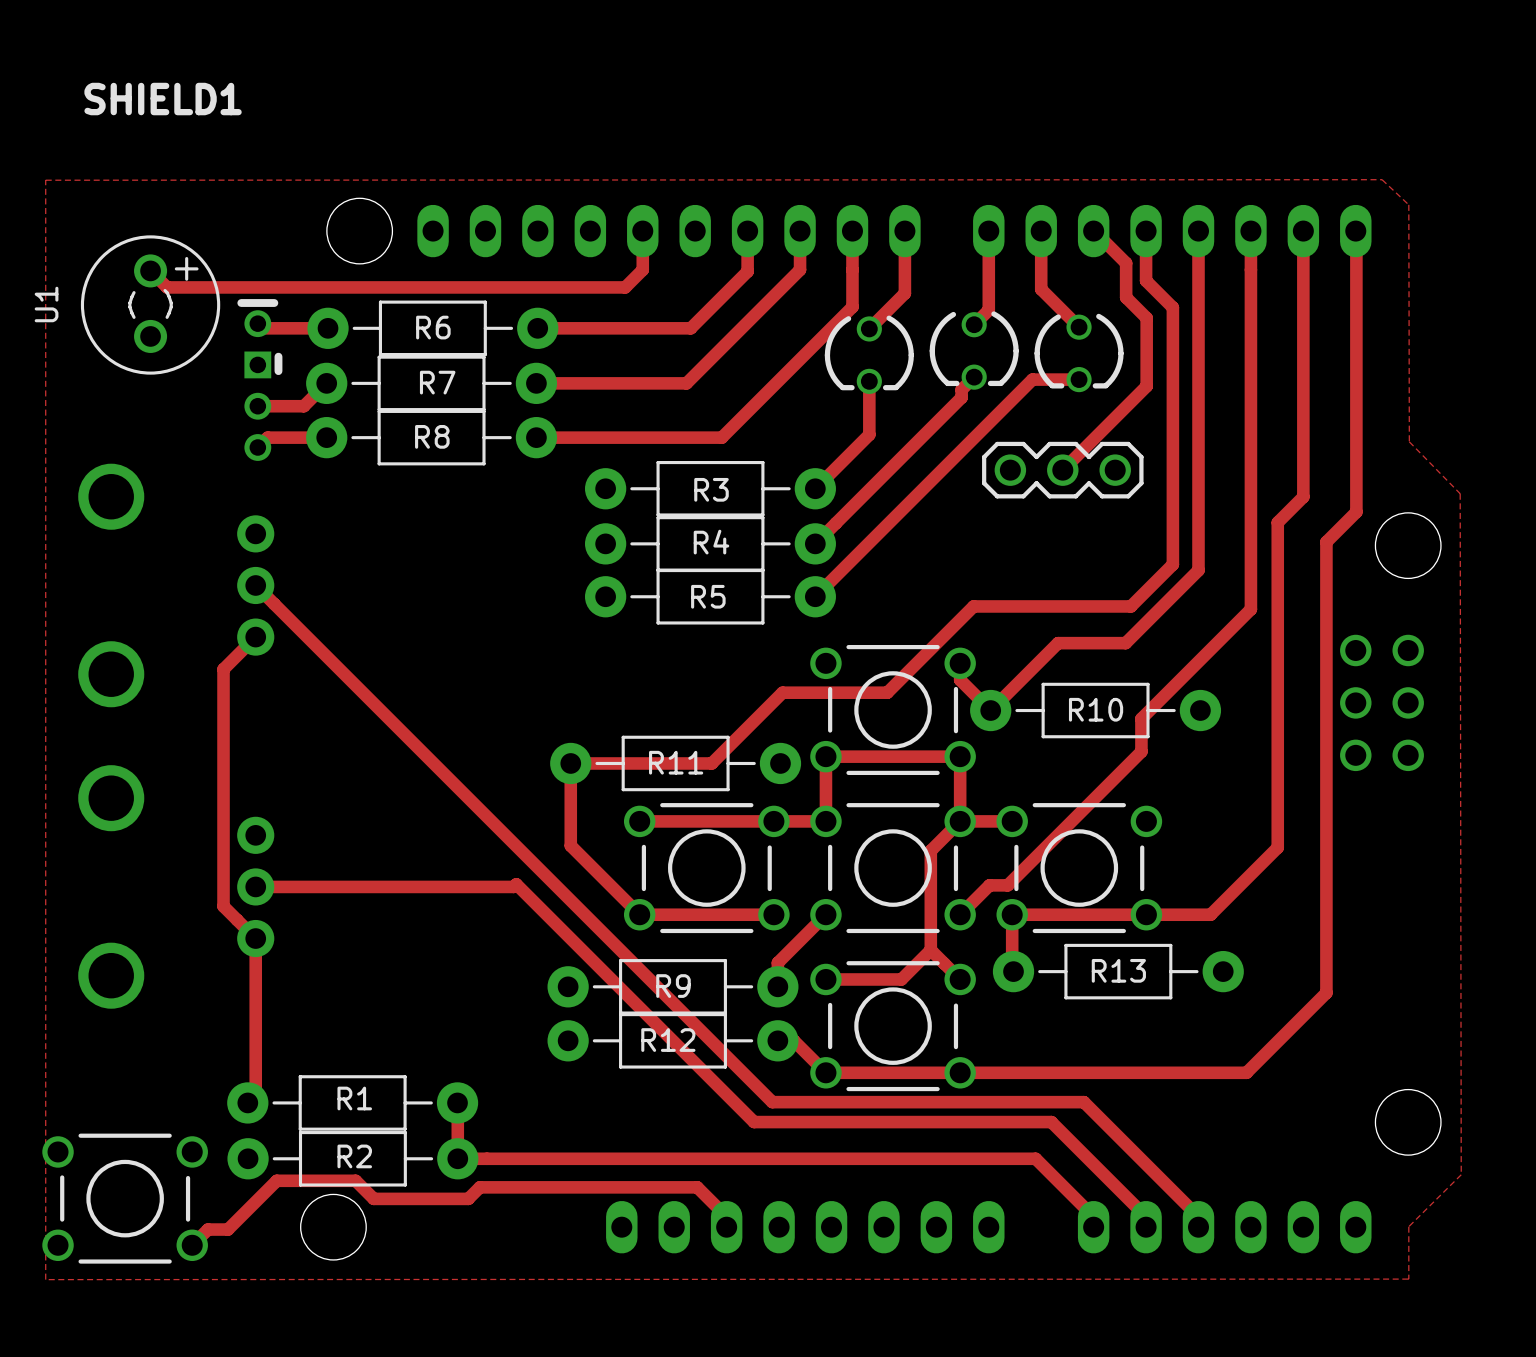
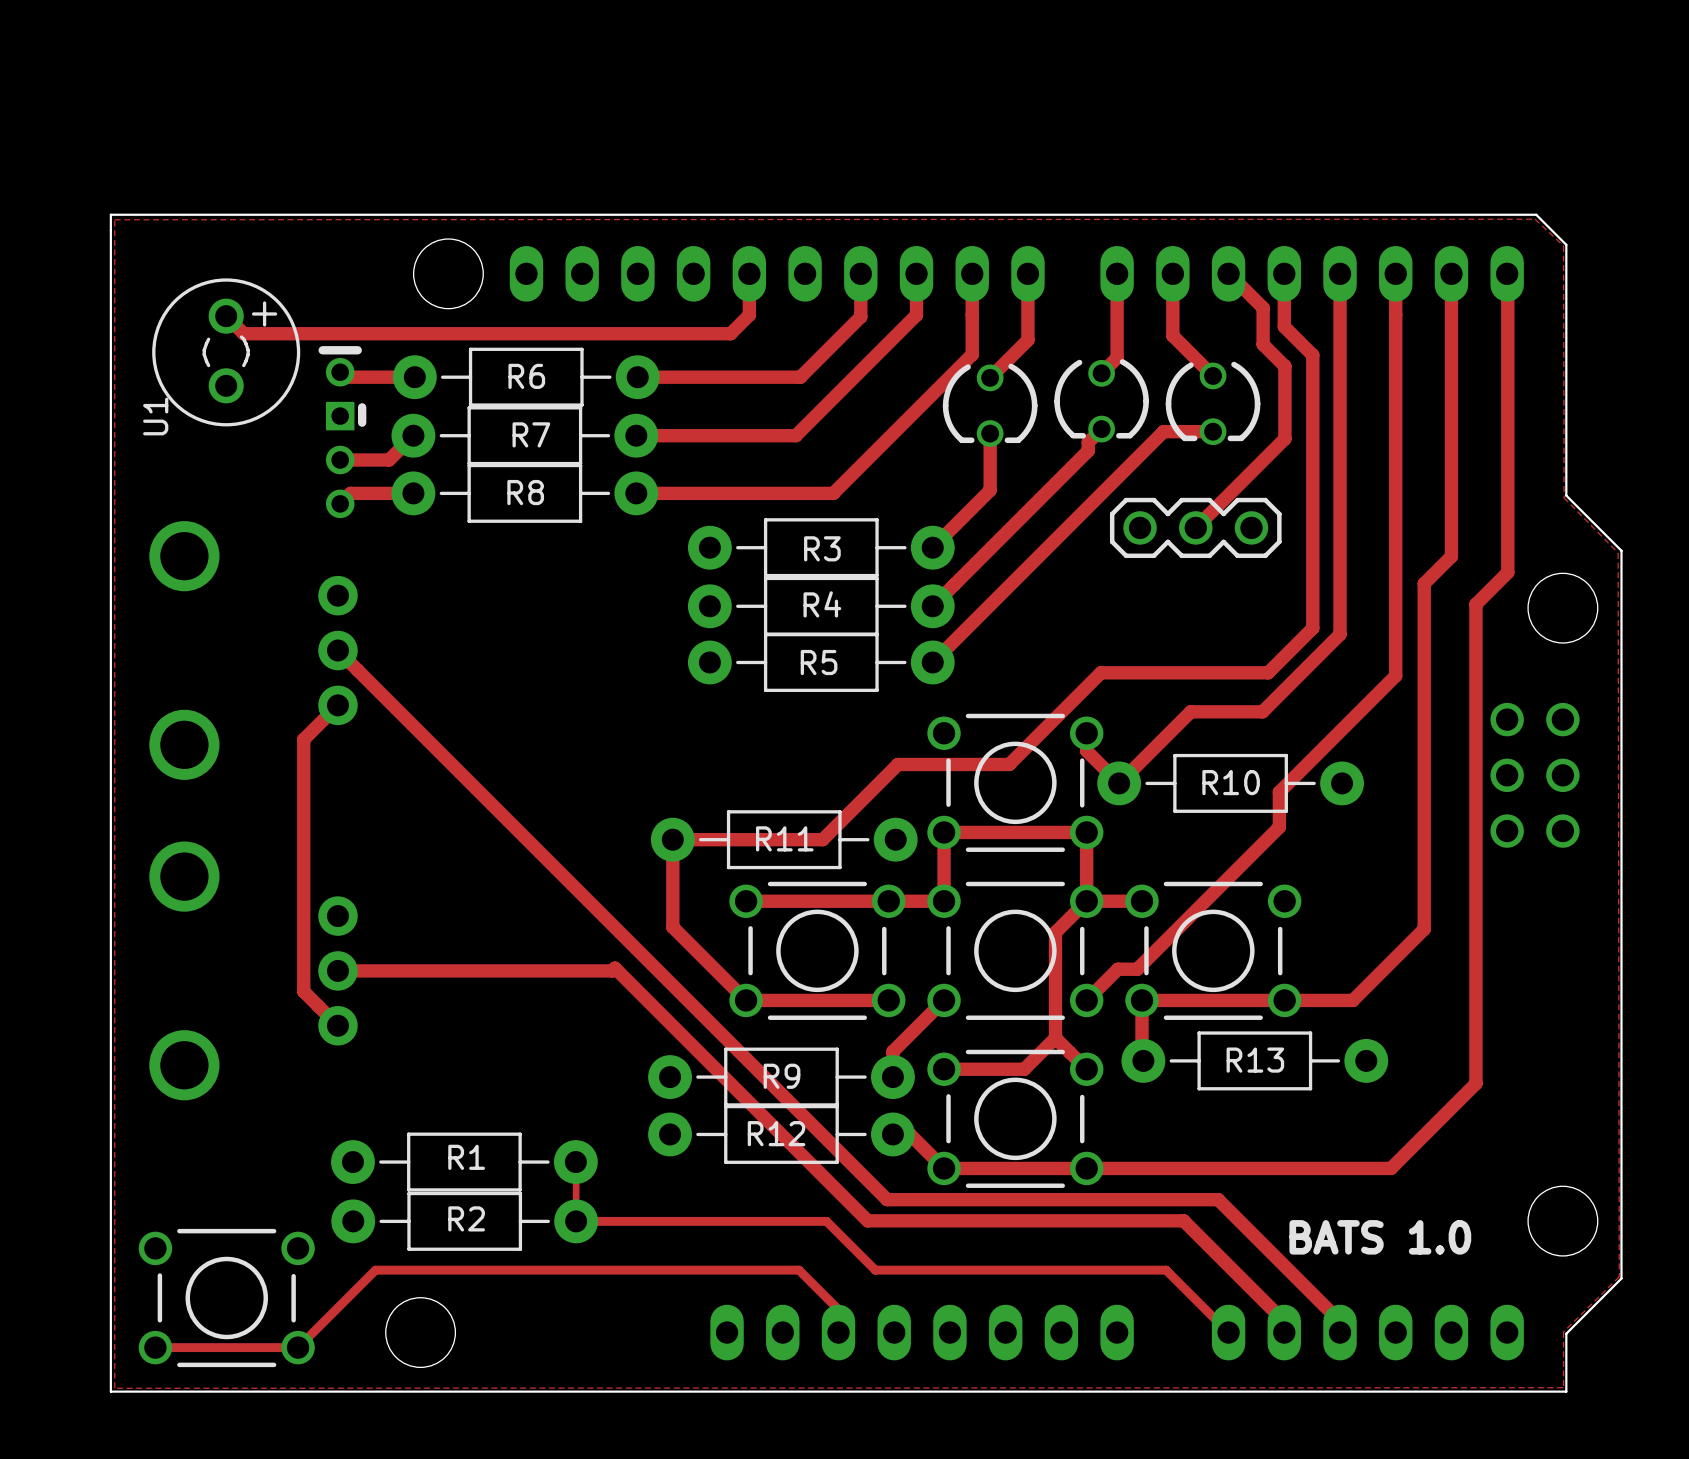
SHIELD1 name: SHIELD1 (163, 99) -> BATS 1.0 (1380, 1237)
board edge: none -> (110, 214) (110, 1391) (1566, 1391) (1566, 1333) (1621, 1278) (1621, 550) (1566, 495) (1566, 244) (1536, 214) (110, 214)
U1 name position: U1 (46, 304) -> U1 (155, 416)
track: (255, 938) (255, 1095) (247, 1102) -> none
track: none -> (576, 1162) (576, 1221) (826, 1221) (875, 1270) (1166, 1270) (1228, 1332)
R1 position: (352, 1102) -> (464, 1162)
track: (457, 1103) (457, 1158) (1035, 1158) (1093, 1216) -> none
R2 position: (352, 1158) -> (464, 1221)
part position: (125, 1198) -> (226, 1298)
track: (726, 1216) (697, 1187) (479, 1187) (468, 1198) (373, 1198) (355, 1180) (276, 1180) (228, 1229) (207, 1229) (192, 1245) -> none
track: none -> (838, 1332) (838, 1309) (799, 1270) (375, 1270) (298, 1347) (155, 1347)

